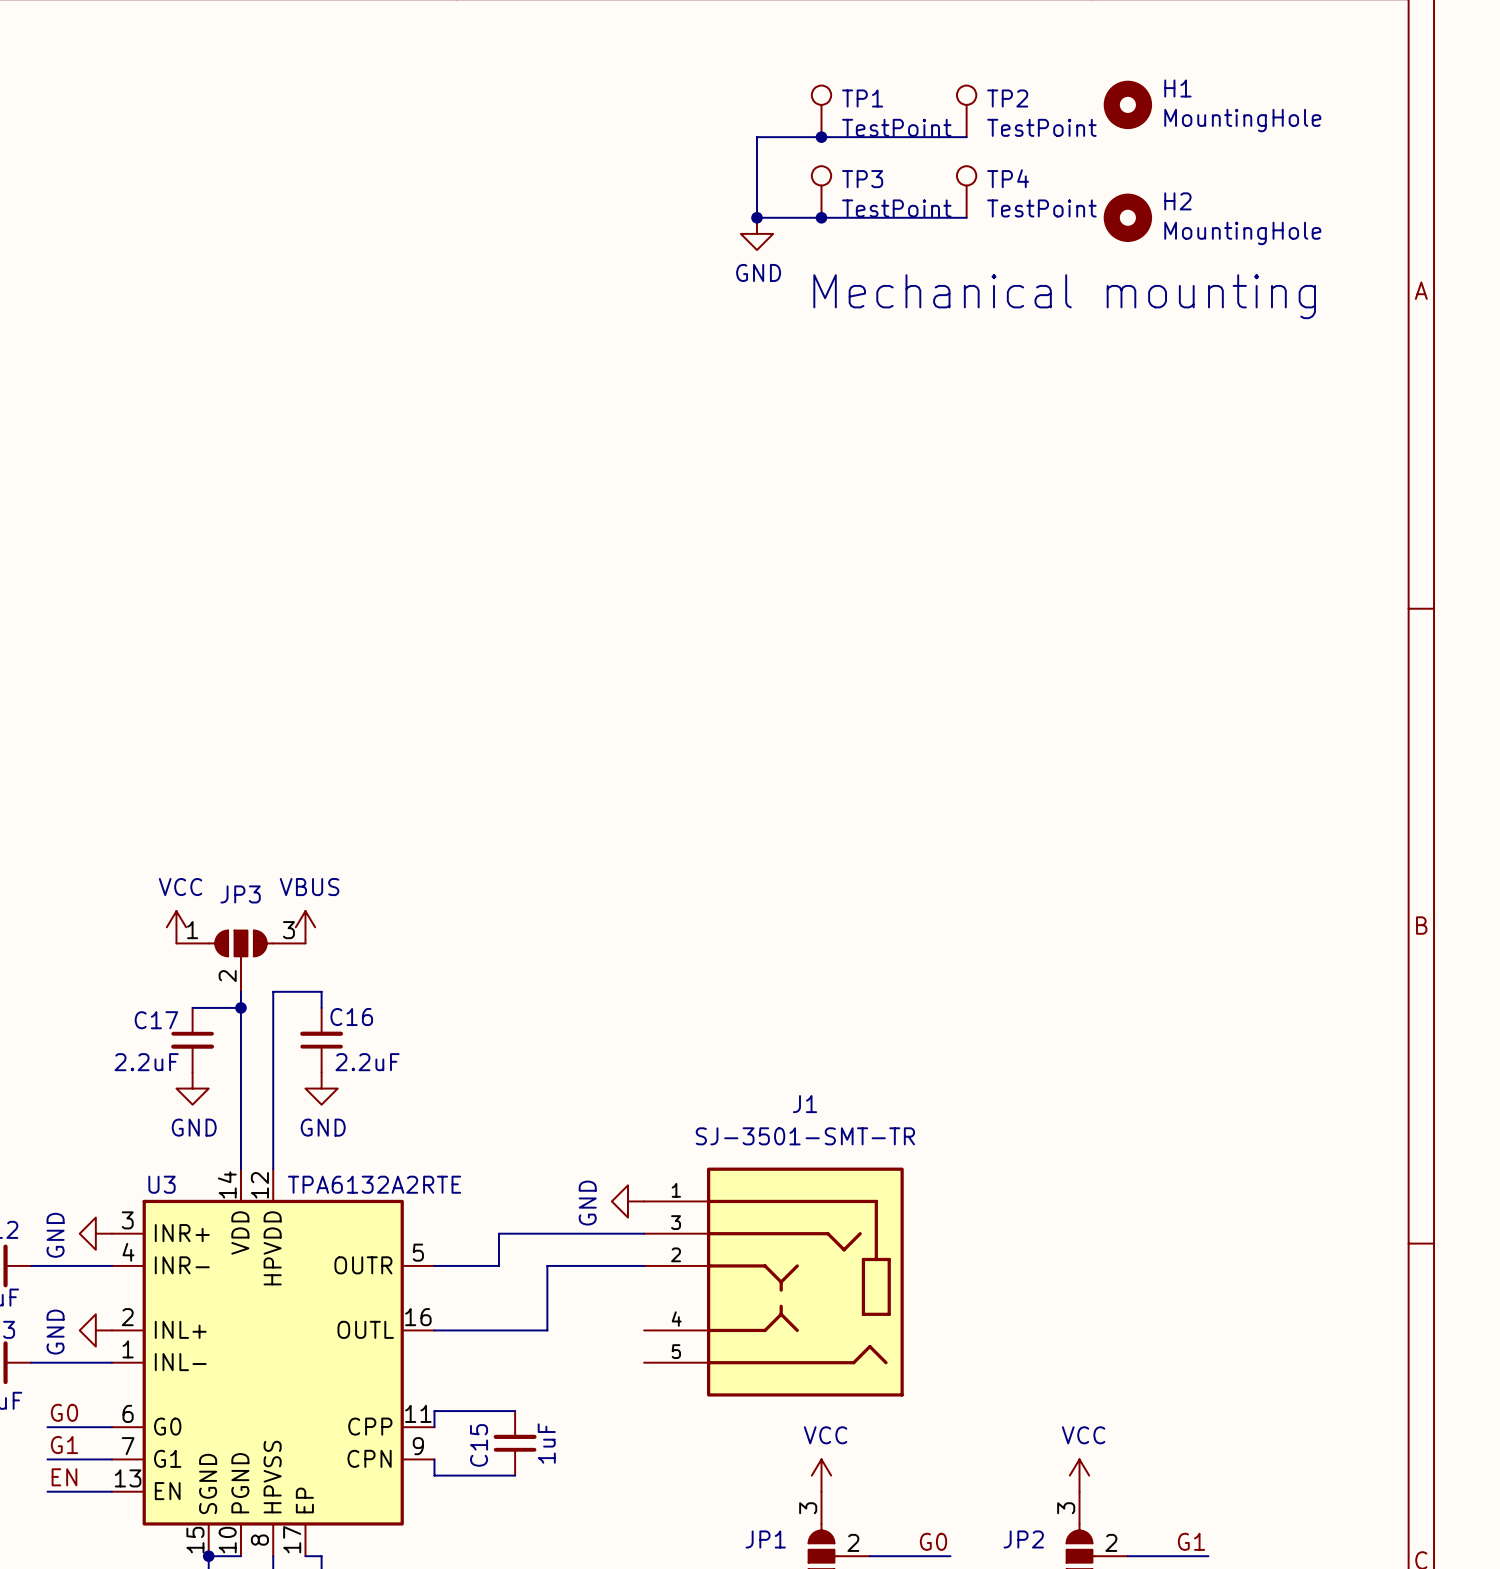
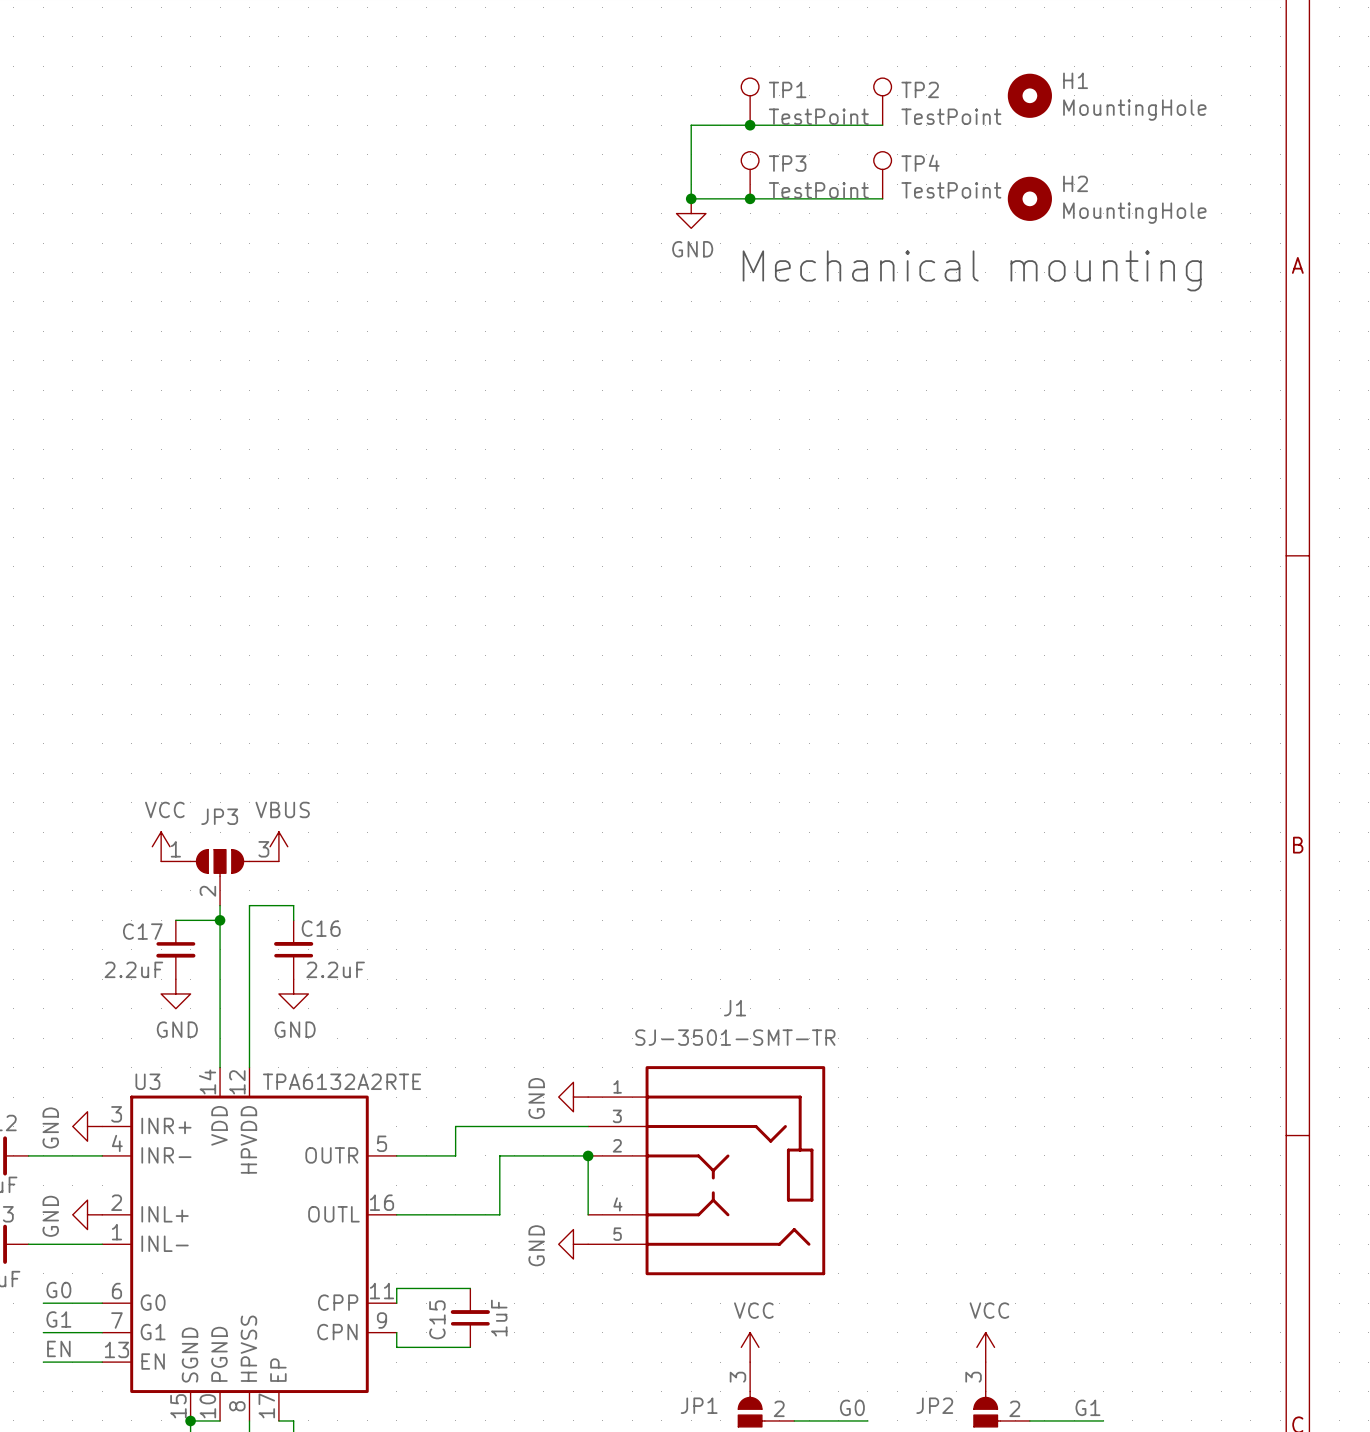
wire: none -> (588, 1155) (588, 1214)
junction: none -> (588, 1155)
power symbol: none -> GND (573, 1244)

